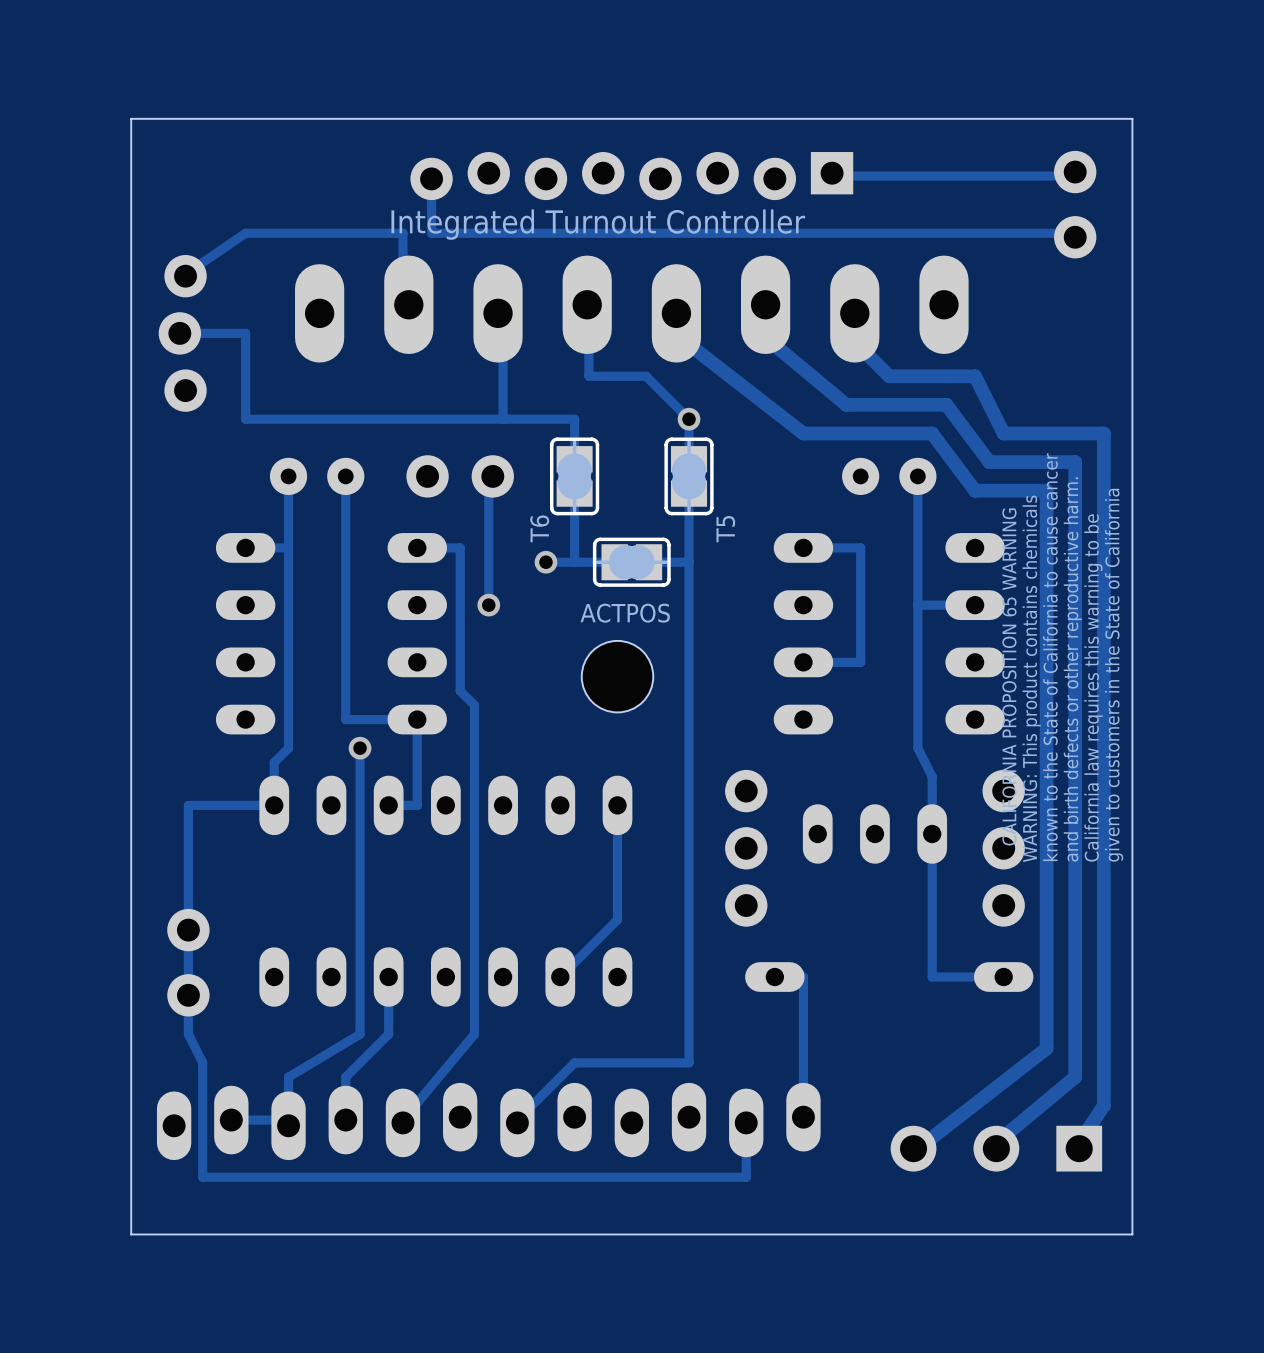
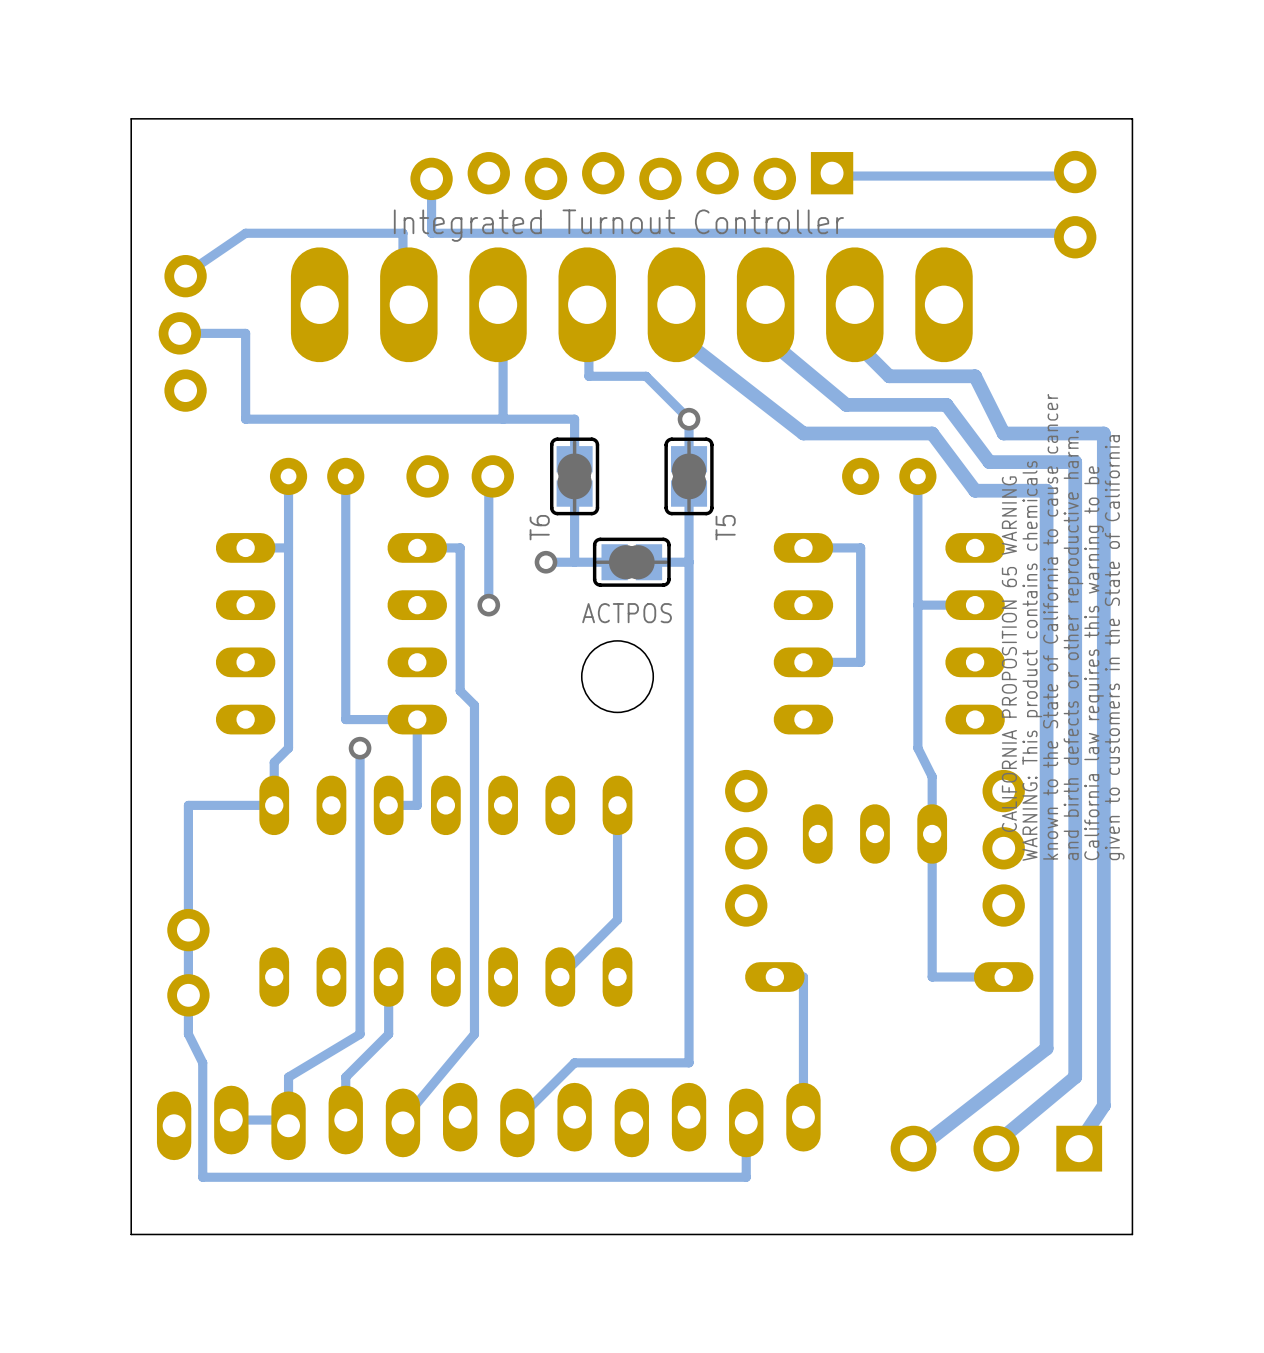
part footprint: [295, 255, 969, 363] -> [290, 247, 973, 363]

